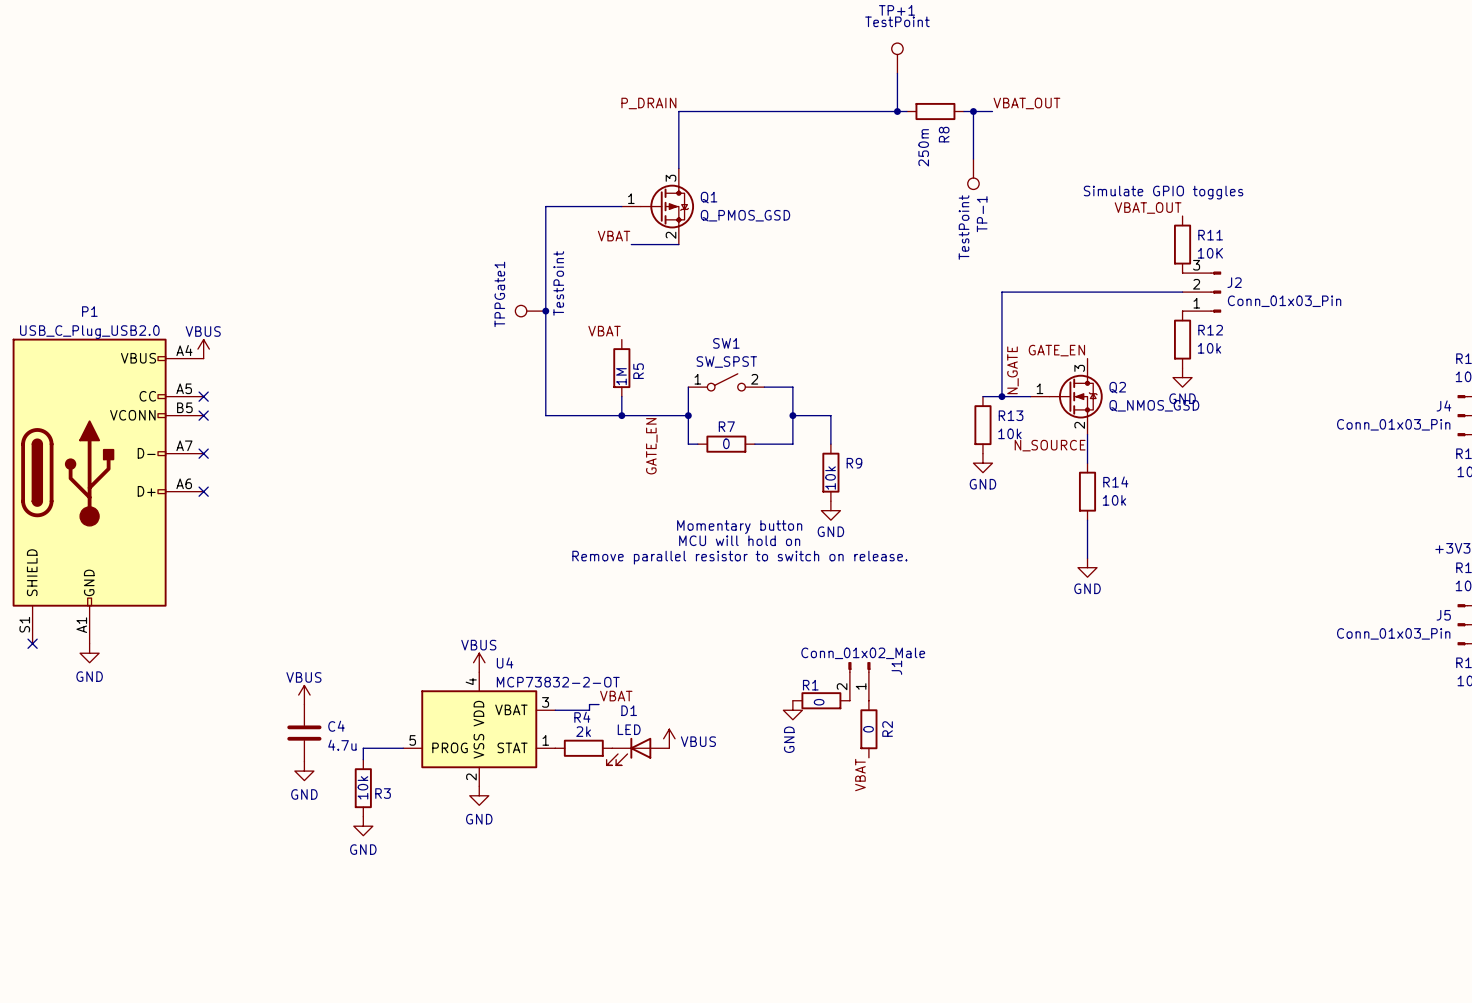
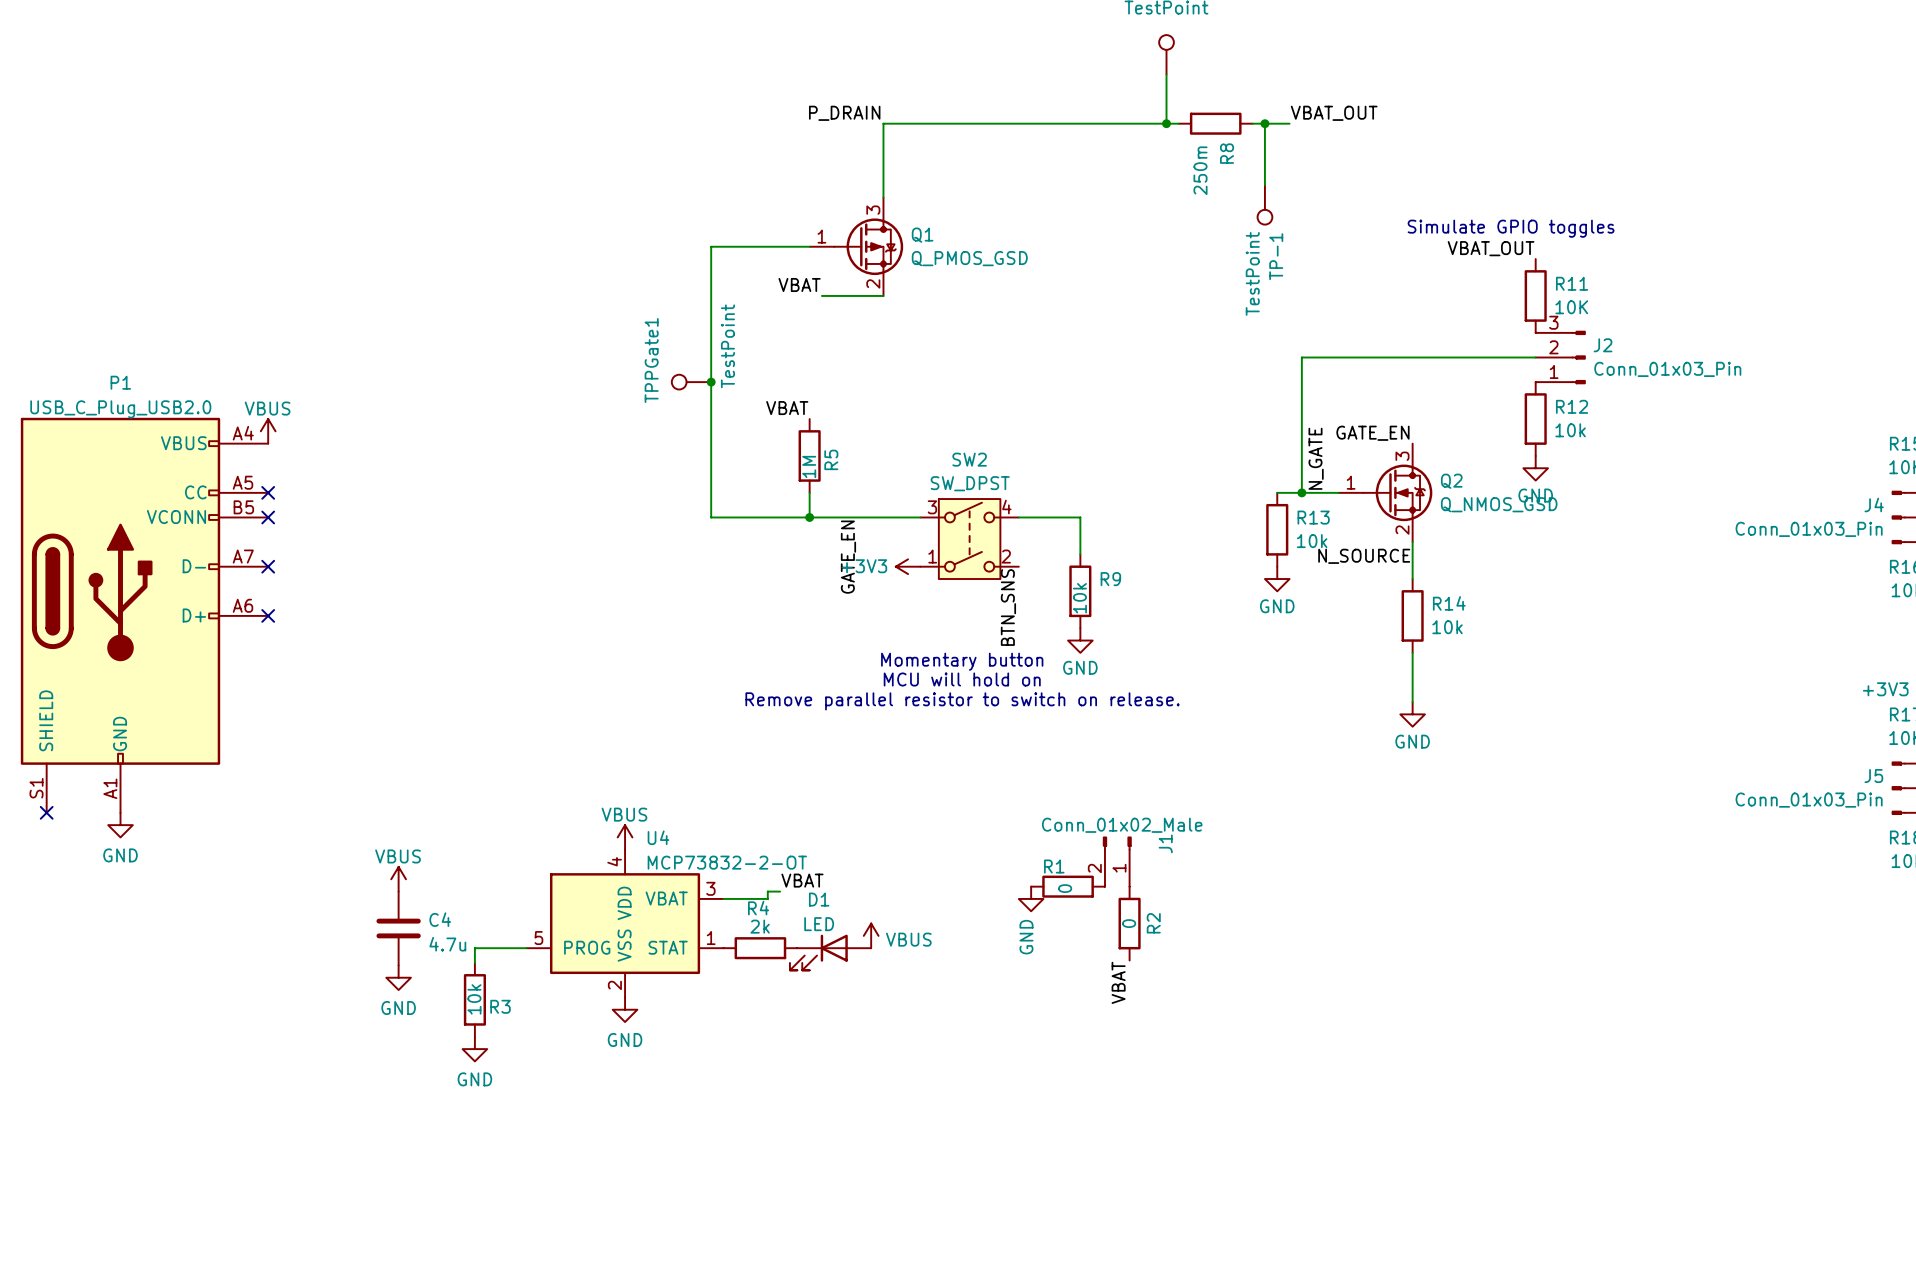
SW1: SW_SPST (726, 382) -> none
wire: (688, 387) (688, 444) (697, 444) -> none
wire: (764, 387) (792, 387) (792, 444) (754, 444) -> none
wire: none -> (895, 517) (920, 517)
junction: (688, 415) -> none
wire: none -> (1018, 517) (1031, 517)
junction: (792, 415) -> none
SW2: none -> SW_DPST (969, 539)
R7: 0 (726, 444) -> none
power symbol: none -> +3V3 (908, 566)
label: none -> BTN_SNS (1008, 607)

